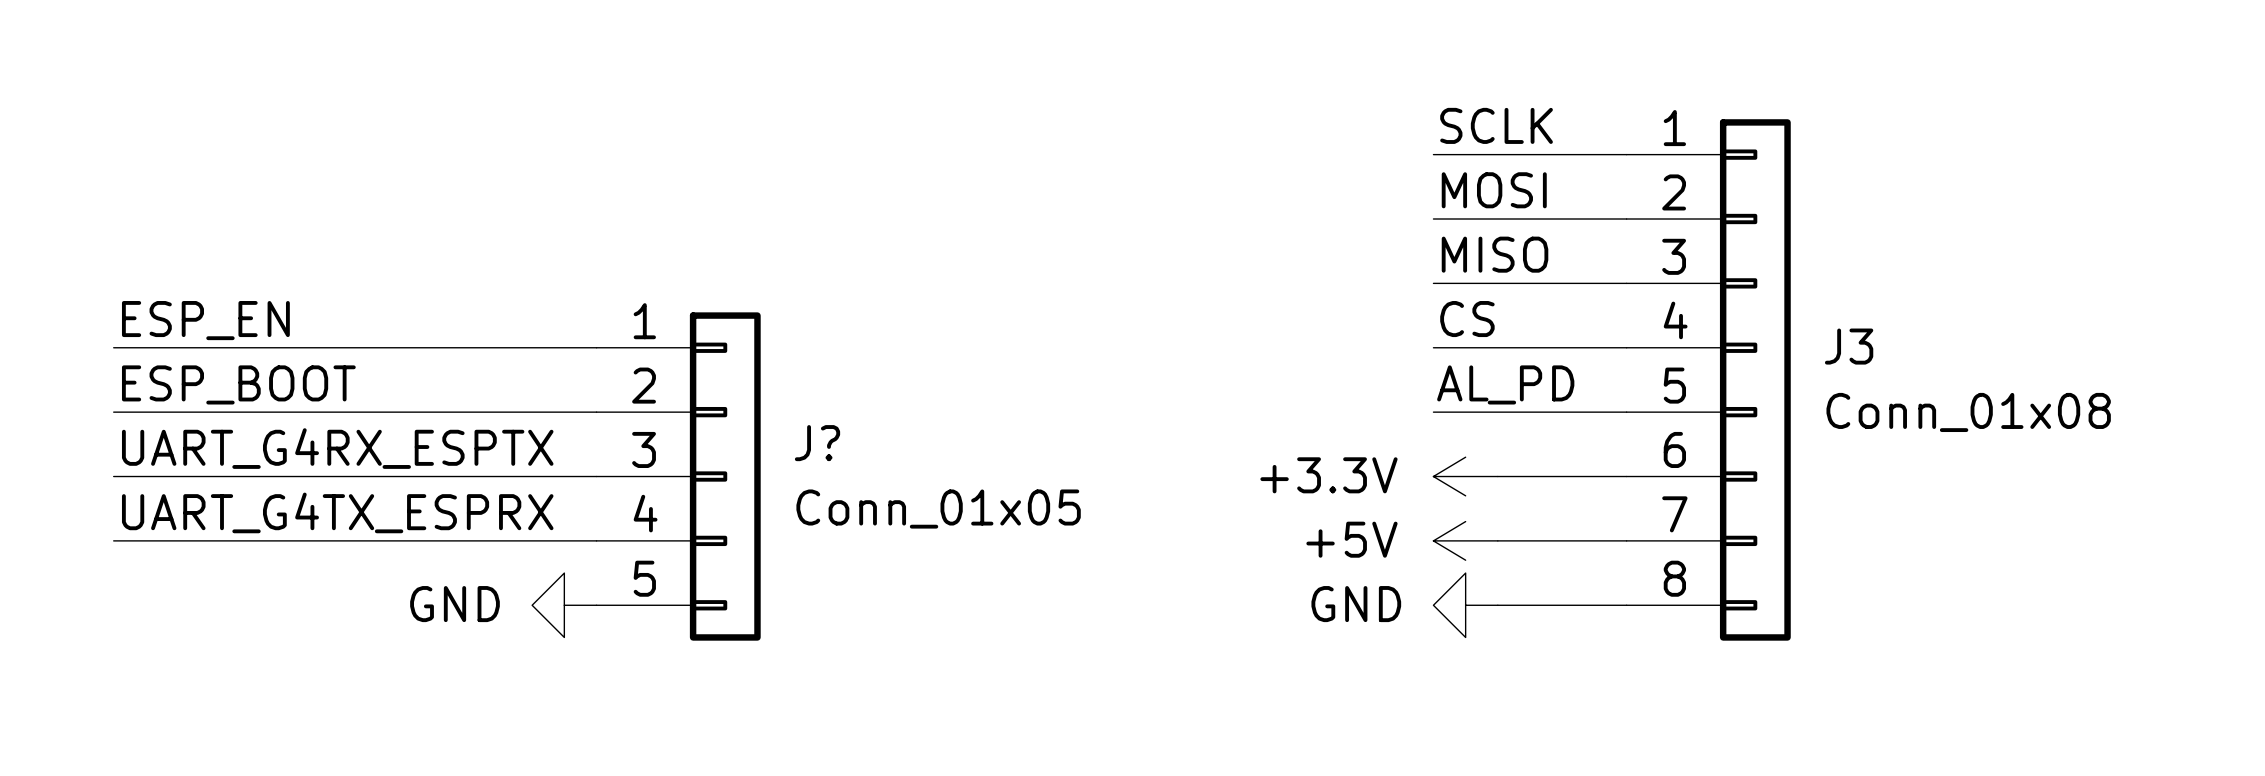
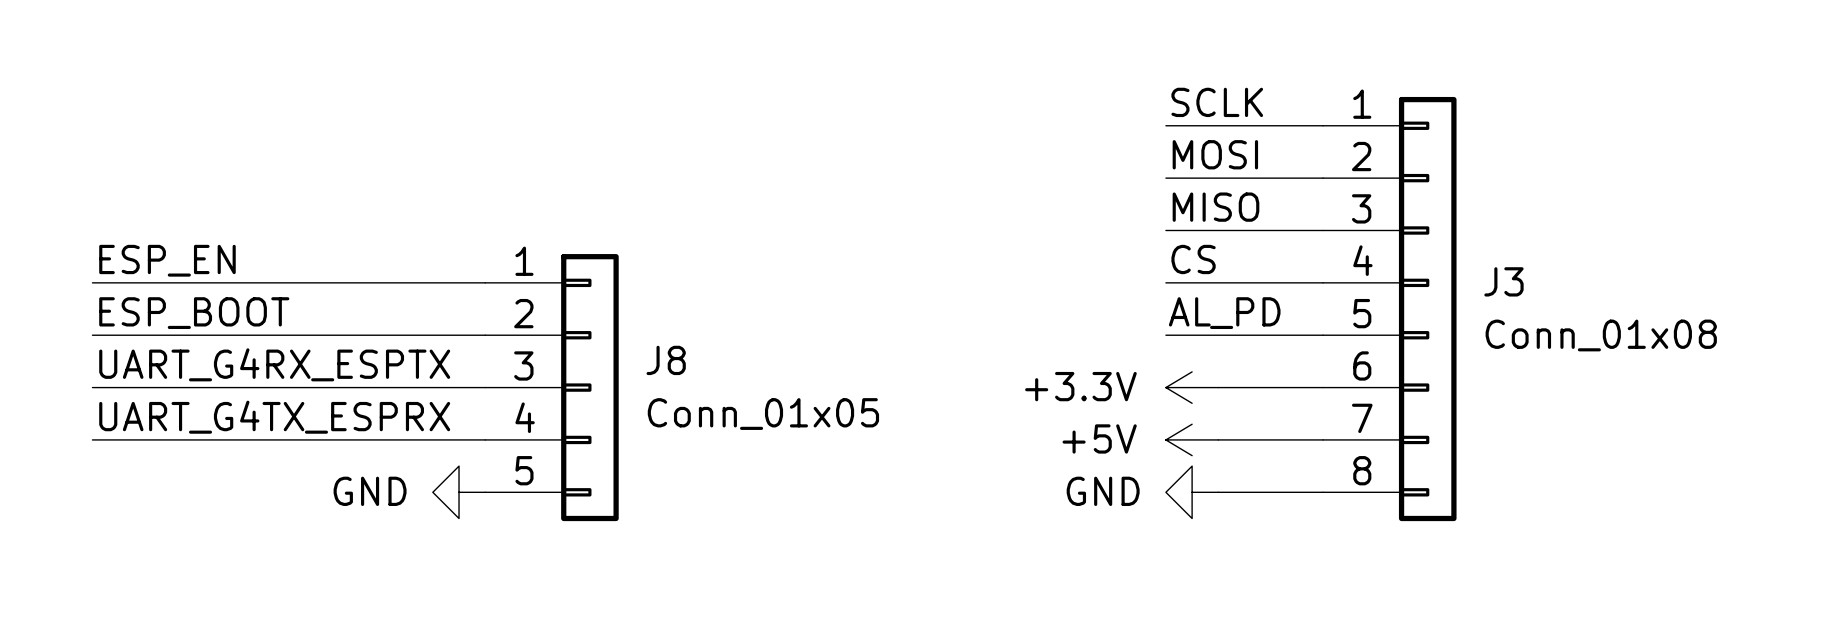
J? name: J? (817, 443) -> J8 (666, 360)

